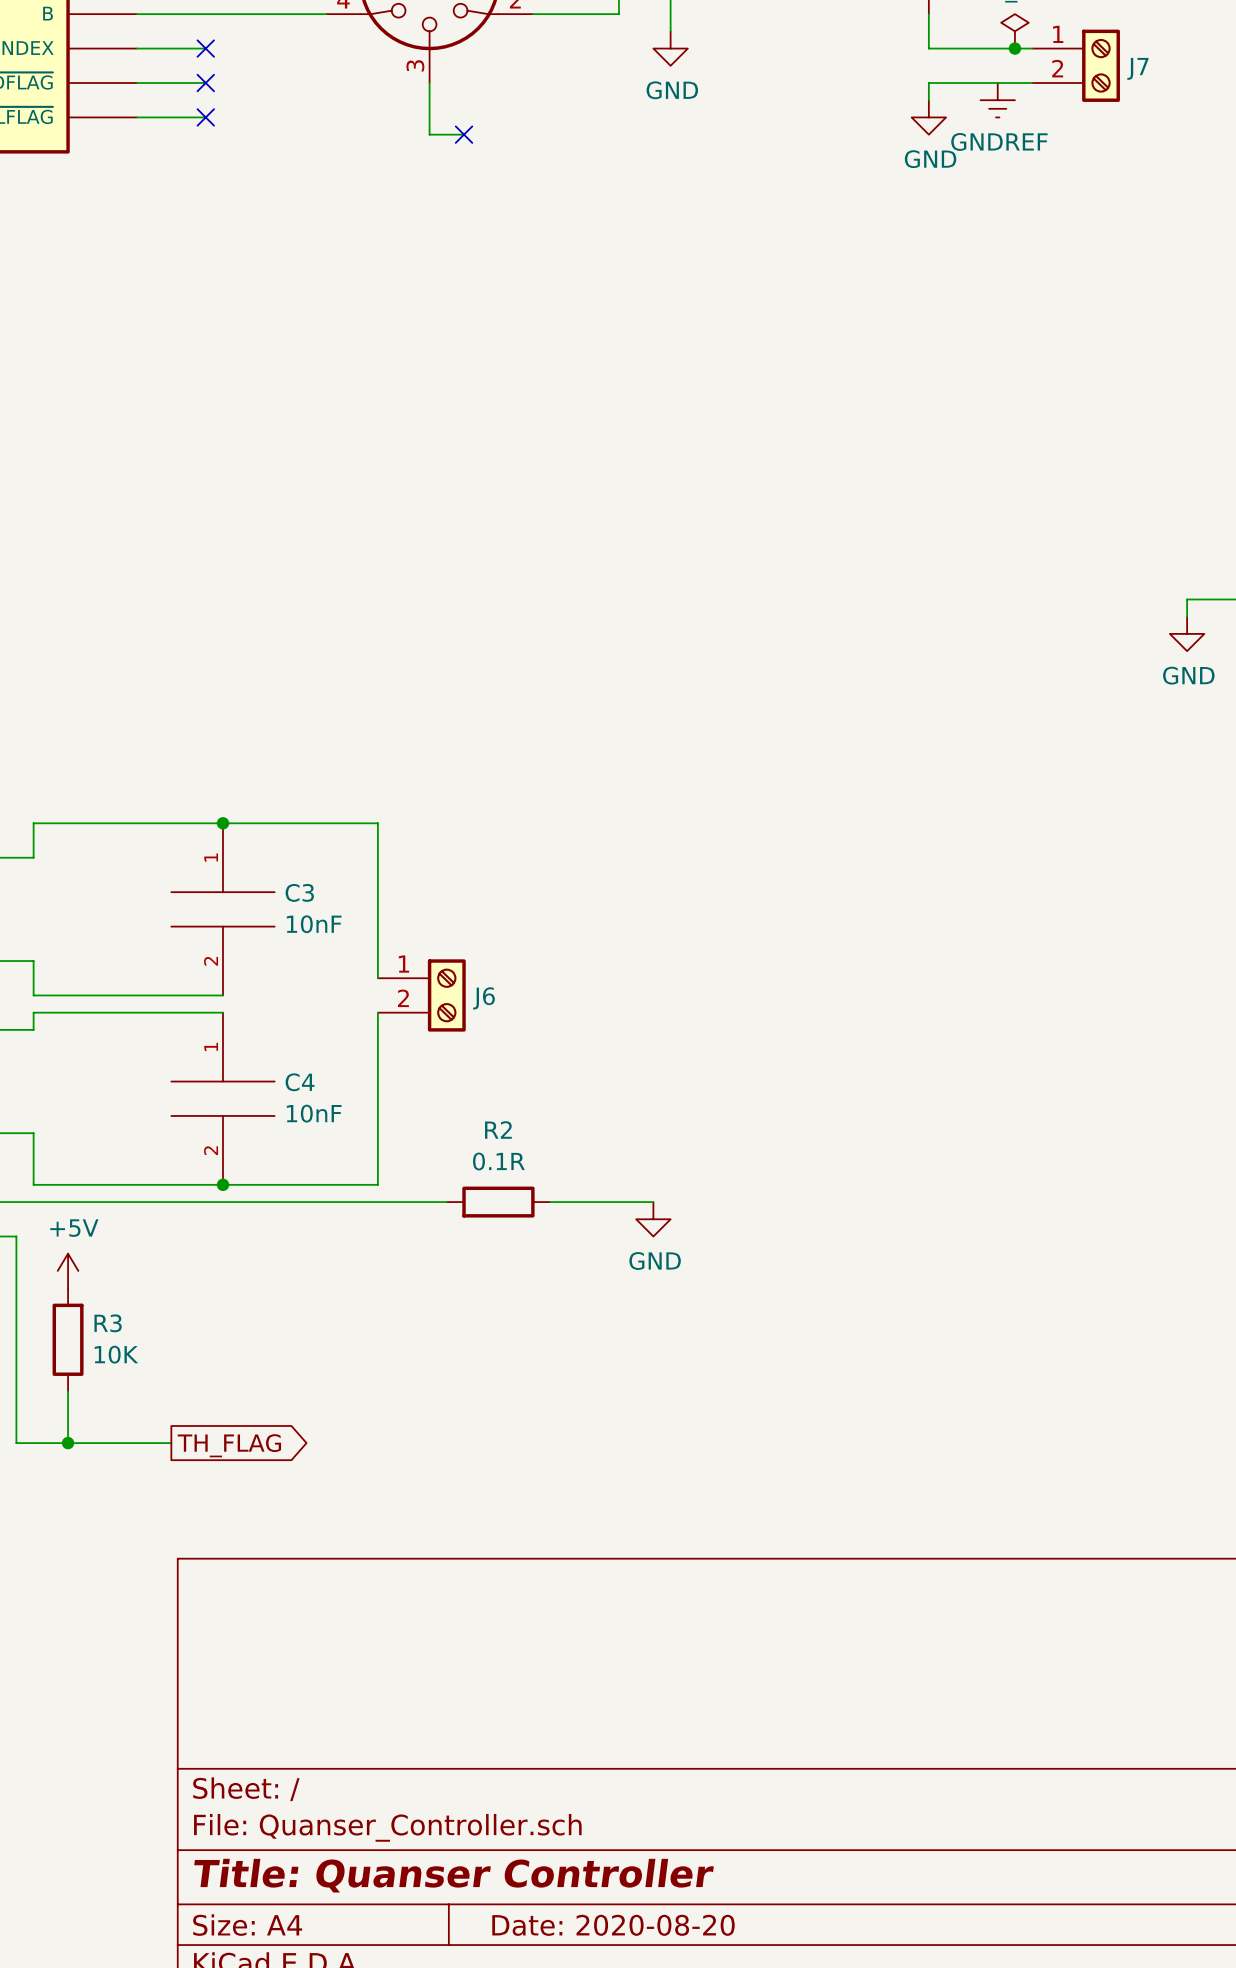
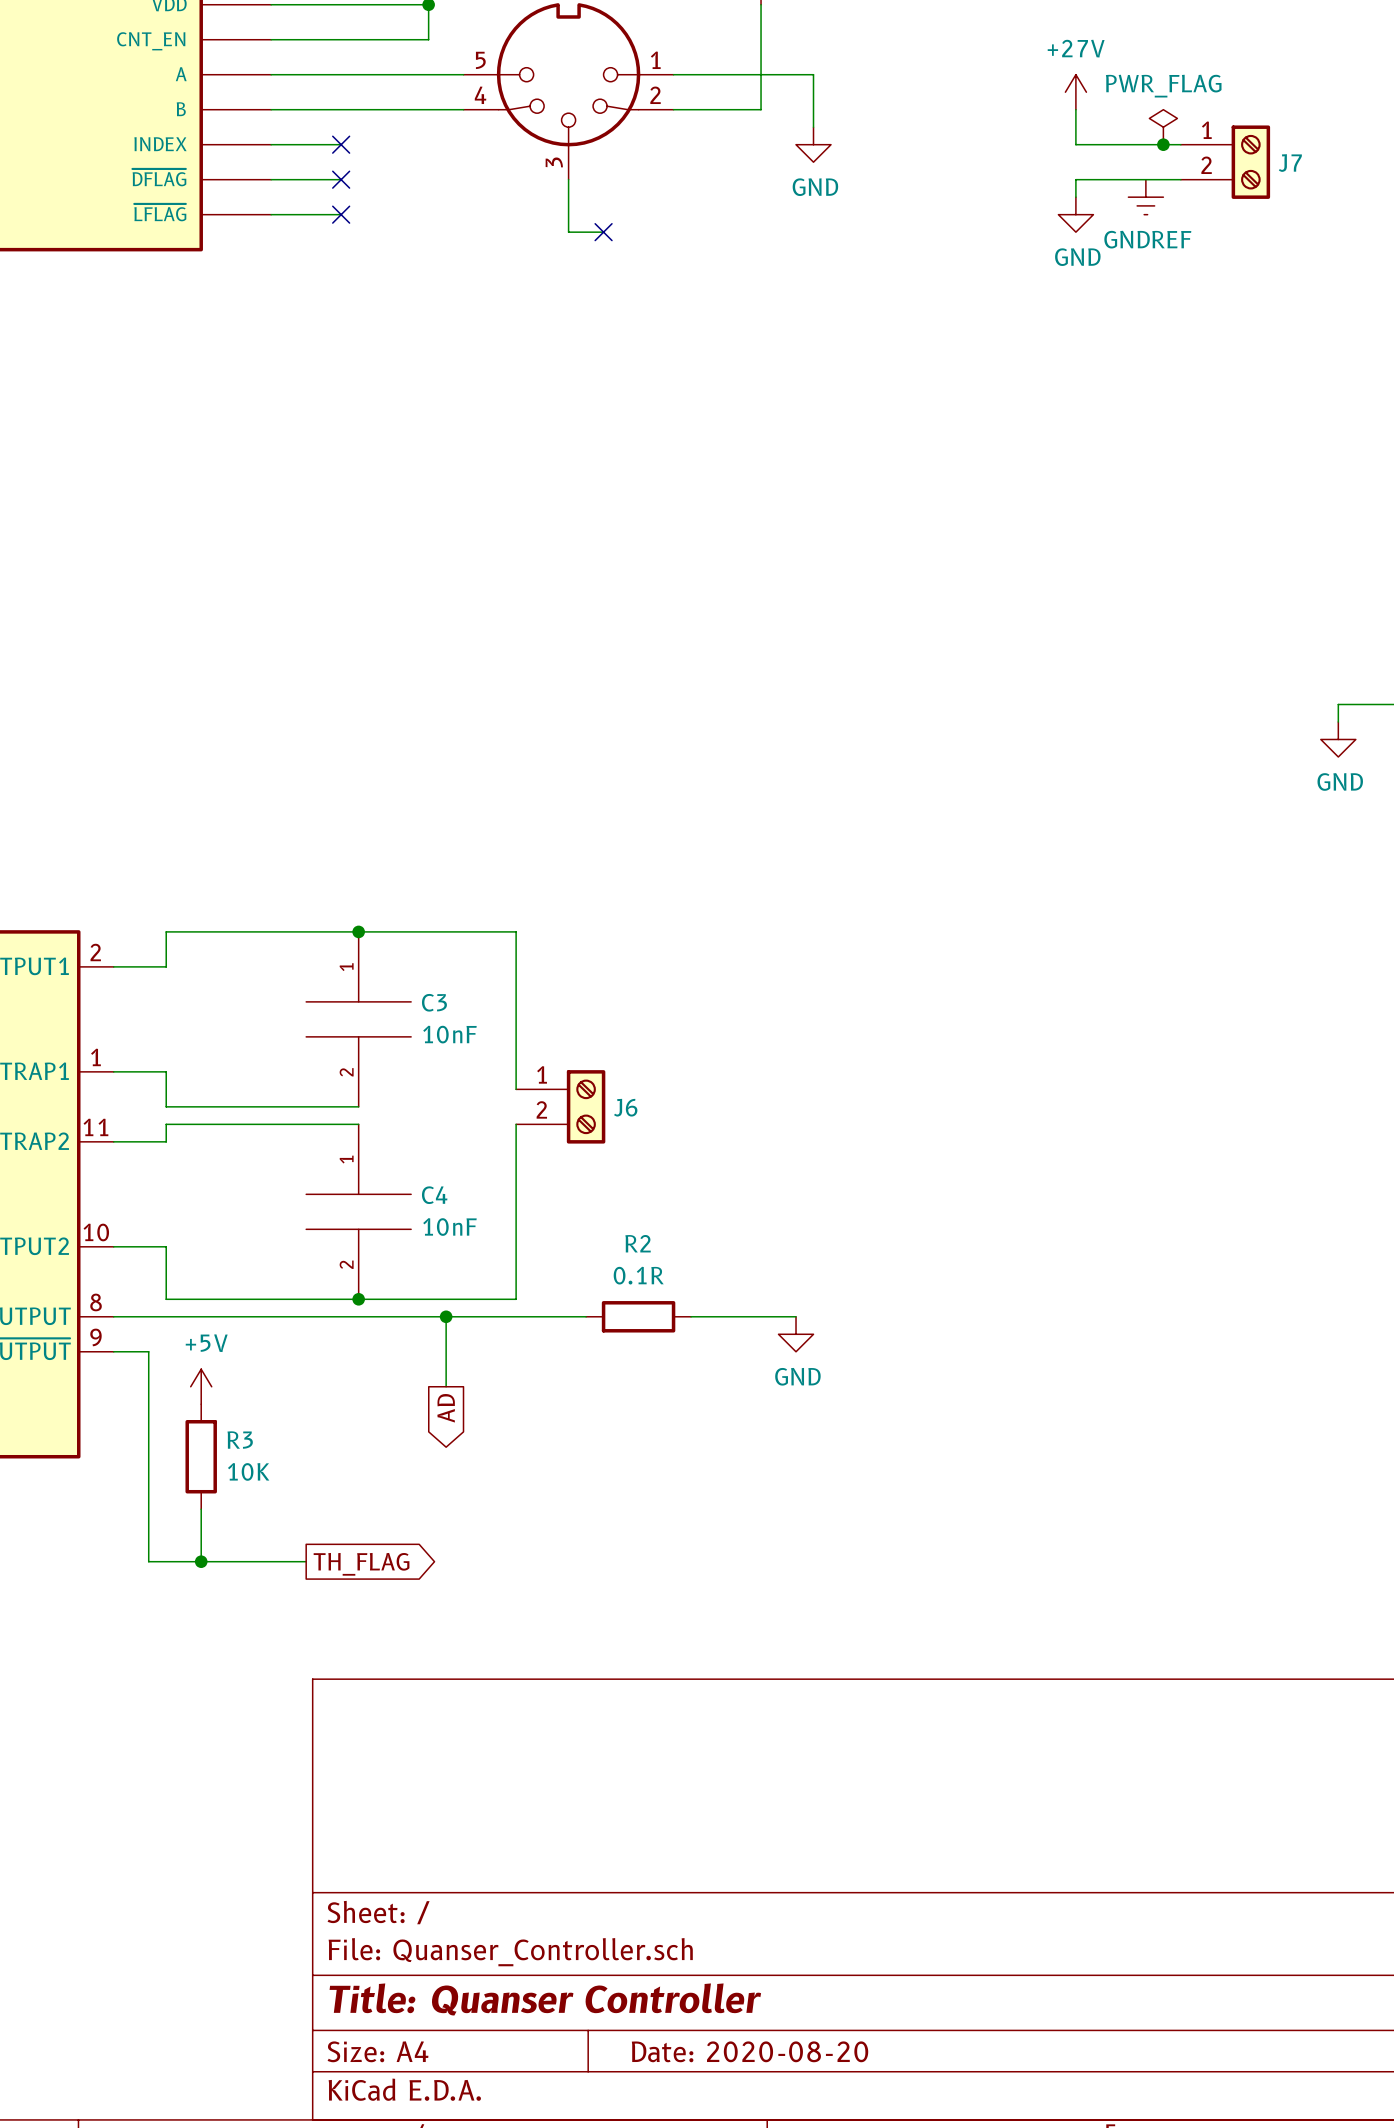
wire: none -> (446, 1316) (446, 1386)
junction: none -> (446, 1316)
global label: none -> AD (446, 1408)

